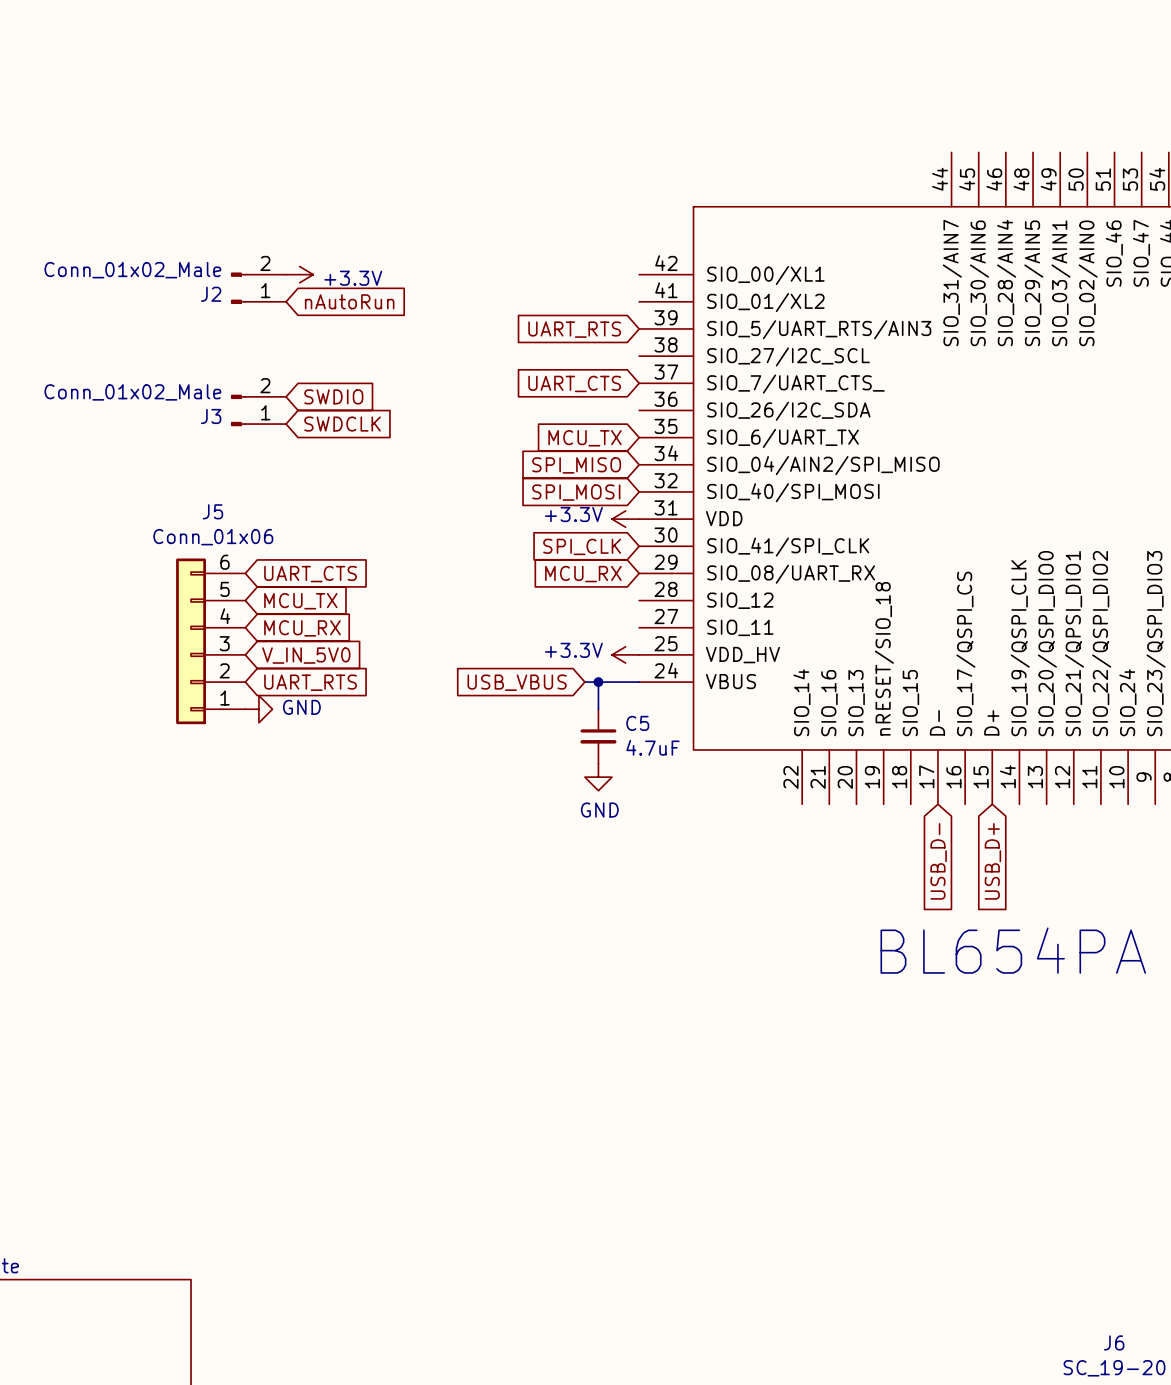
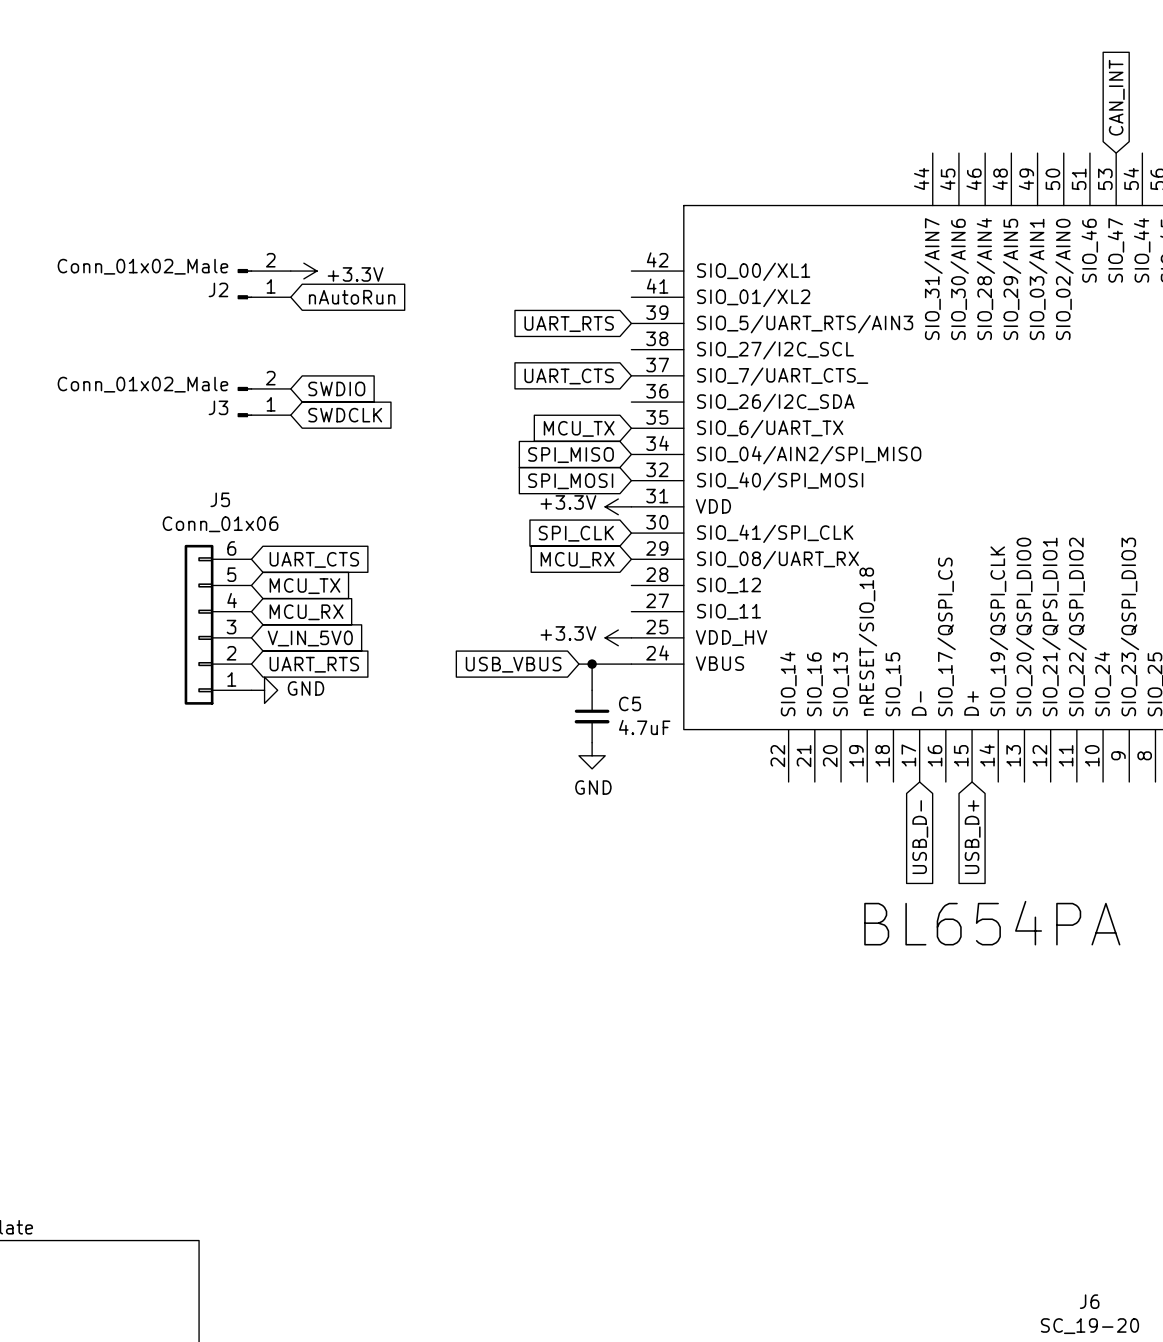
global label: none -> CAN_INT (1116, 97)

